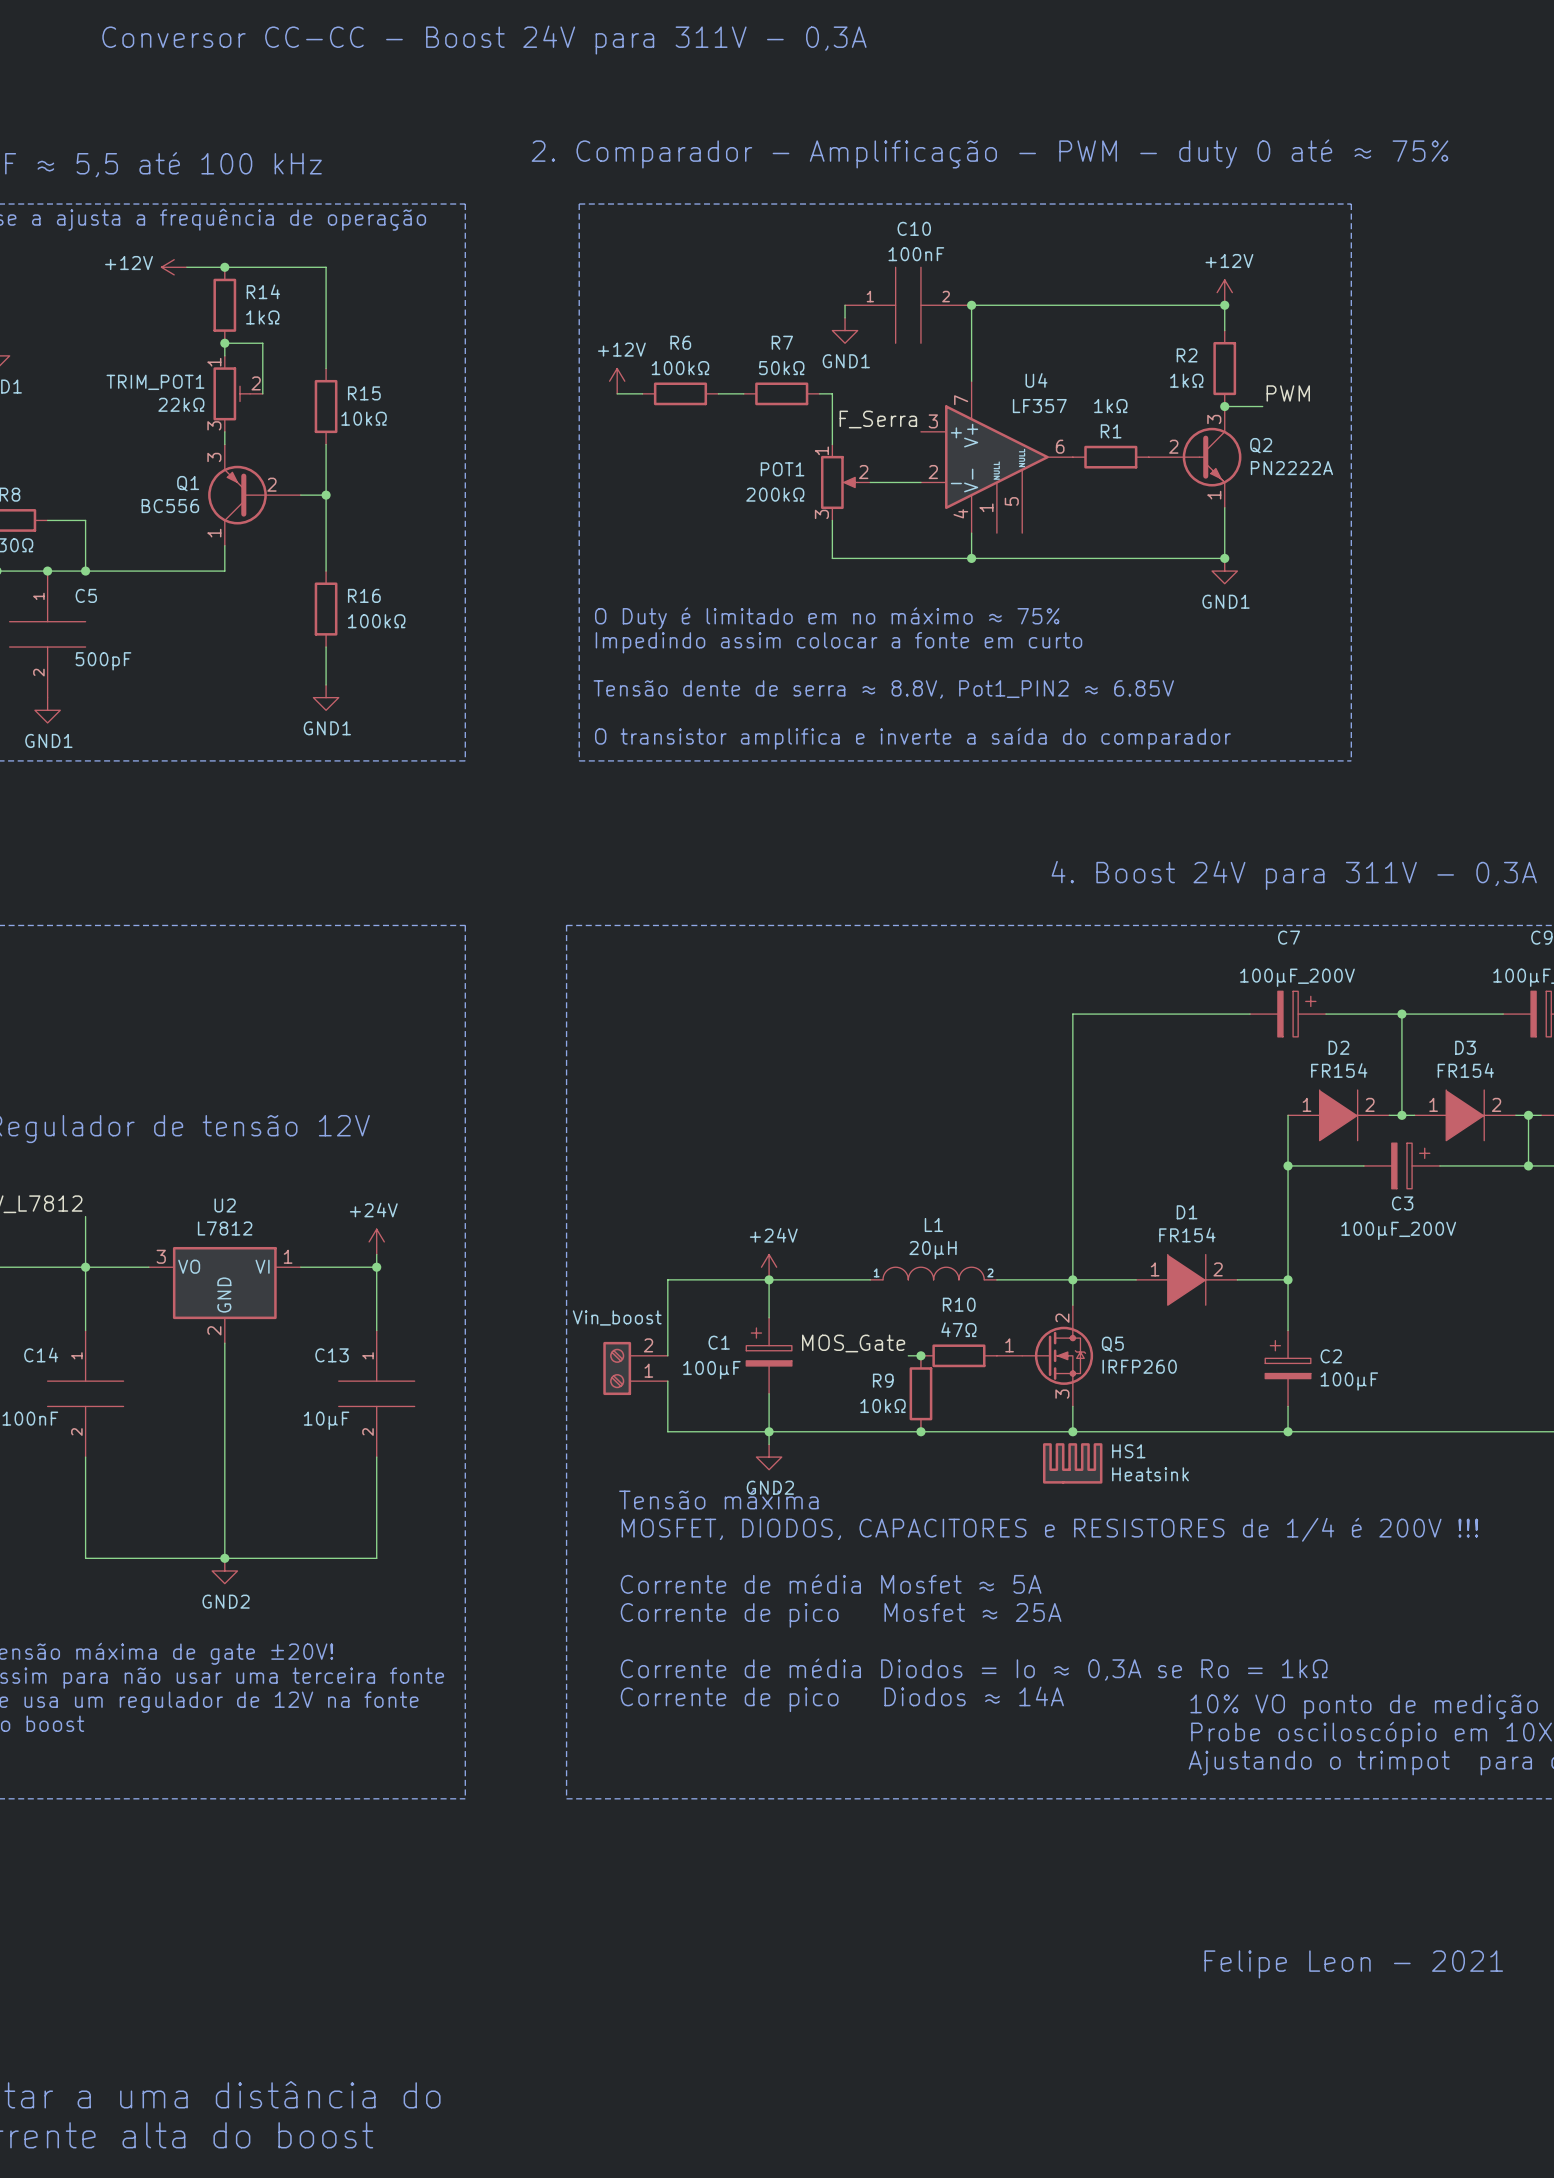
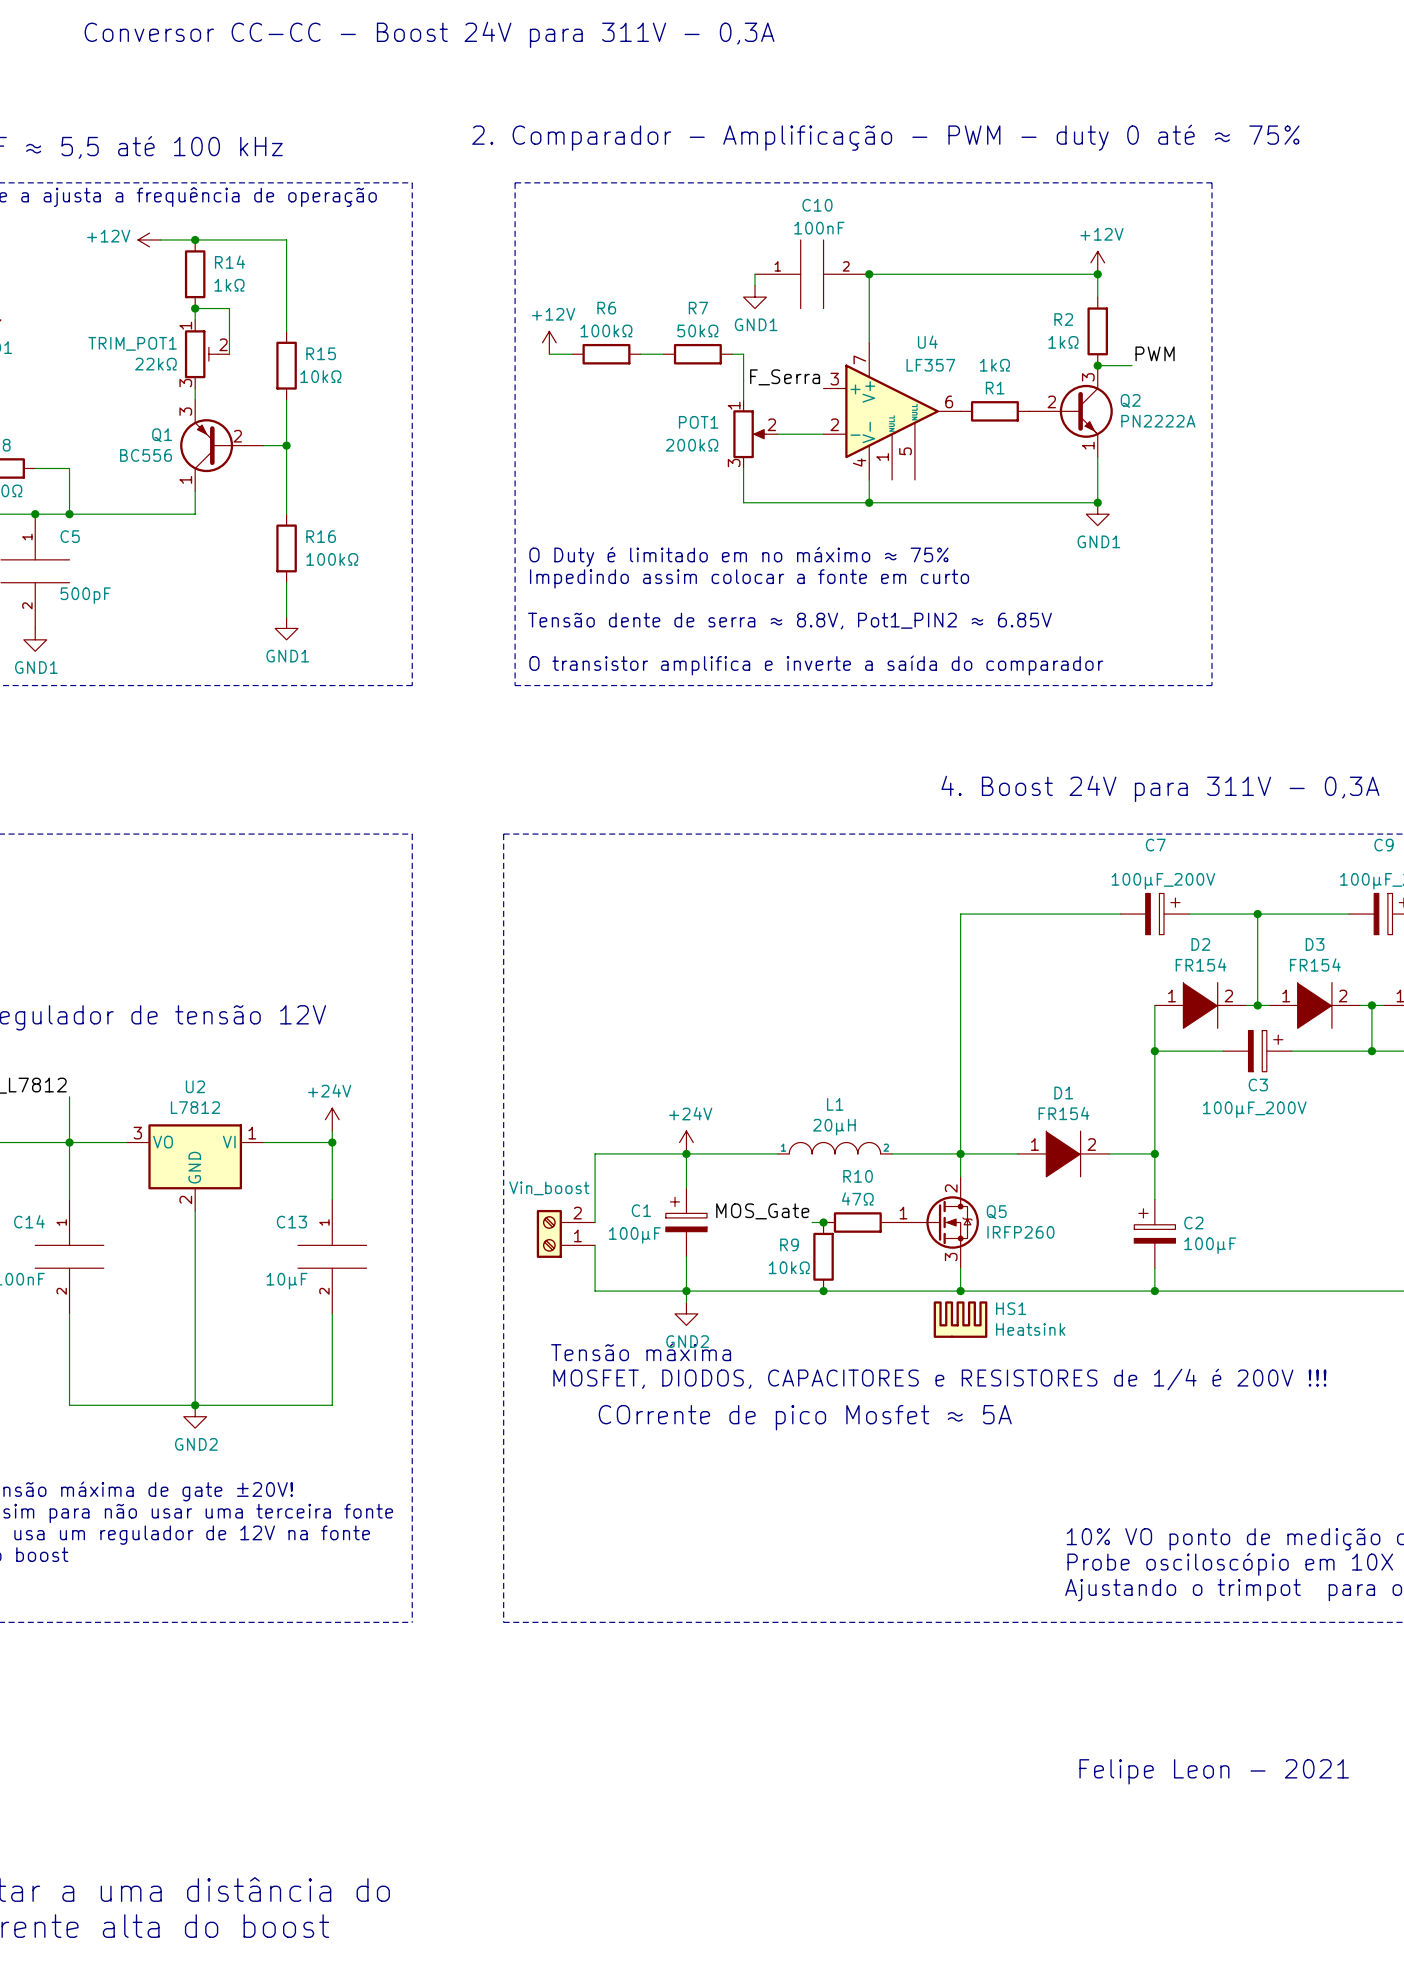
text: Corrente de média Mosfet ≈ 5A (831, 1583) -> COrrente de pico Mosfet ≈ 5A (805, 1417)
text: Corrente de pico Mosfet ≈ 25A (841, 1615) -> none
text: Corrente de média Diodos = Io ≈ 0,3A se Ro = 1kΩ (974, 1669) -> none
text: Corrente de pico Diodos ≈ 14A (842, 1699) -> none

